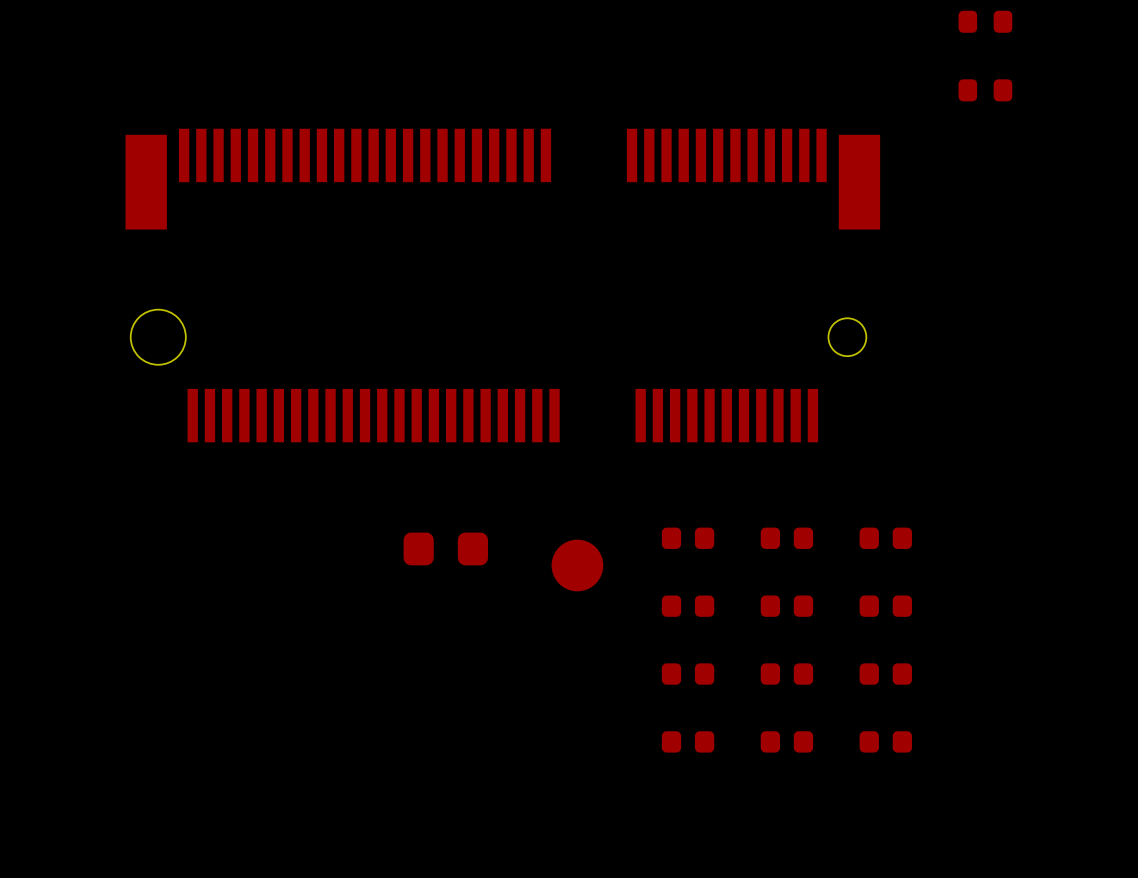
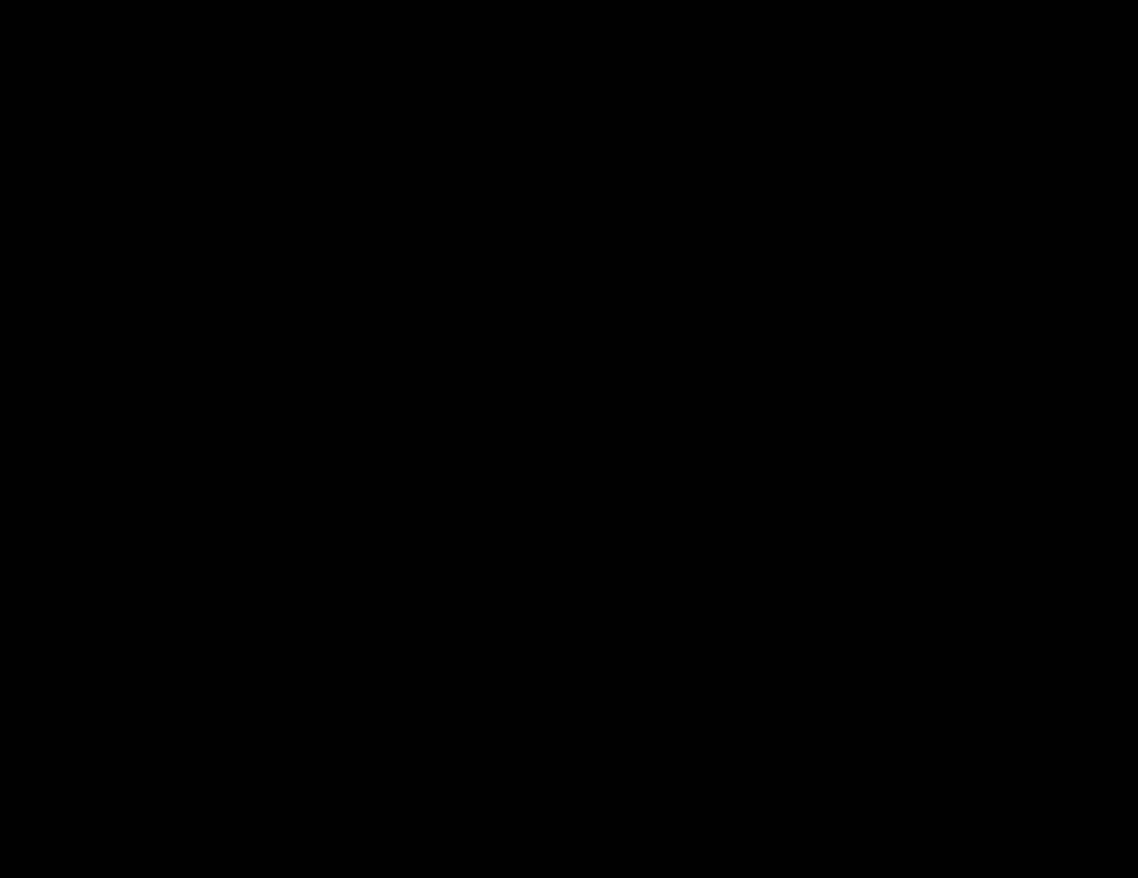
part: (985, 21) -> none
part: (985, 90) -> none
part: (502, 285) -> none
part: (688, 538) -> none
part: (786, 538) -> none
part: (885, 538) -> none
part: (445, 548) -> none
part: (577, 565) -> none
part: (688, 606) -> none
part: (786, 606) -> none
part: (885, 606) -> none
part: (688, 674) -> none
part: (786, 674) -> none
part: (885, 674) -> none
part: (688, 741) -> none
part: (786, 741) -> none
part: (885, 741) -> none

